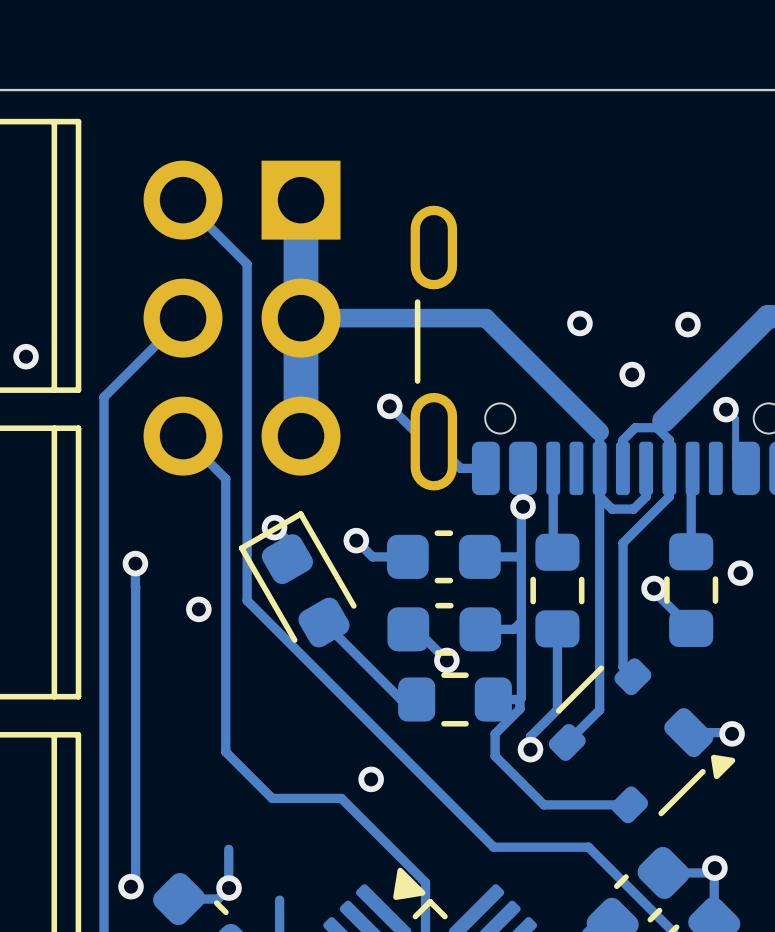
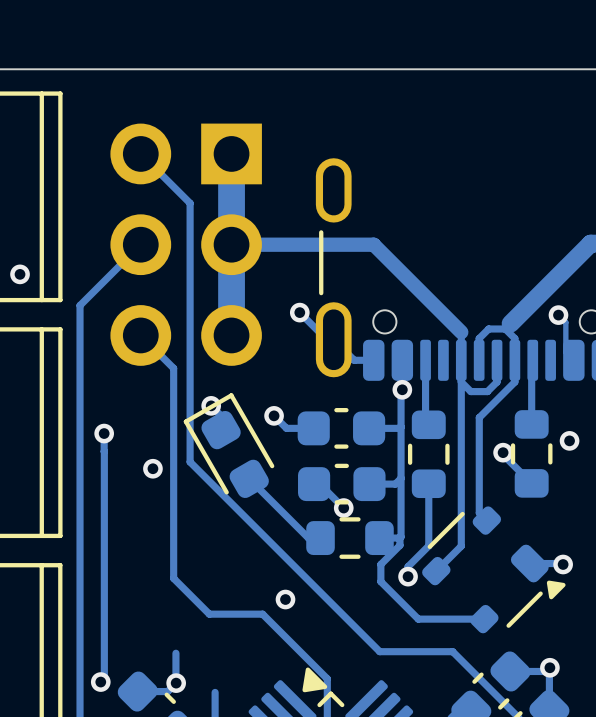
via: (579, 323) -> none
via: (687, 324) -> none
via: (632, 374) -> none

